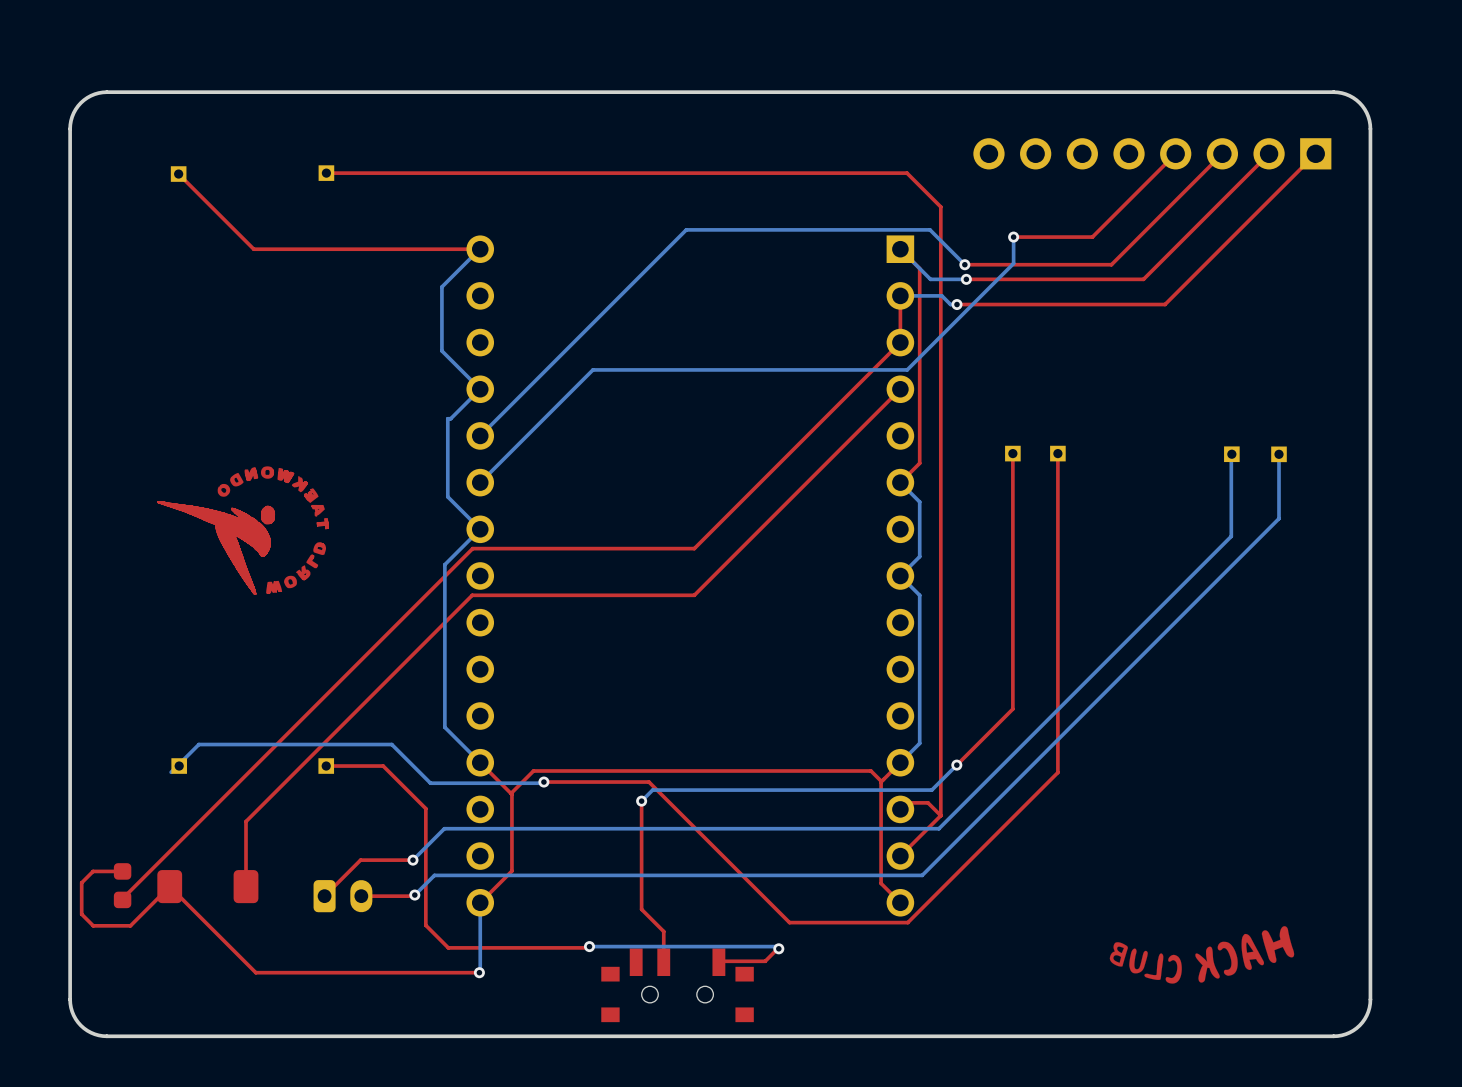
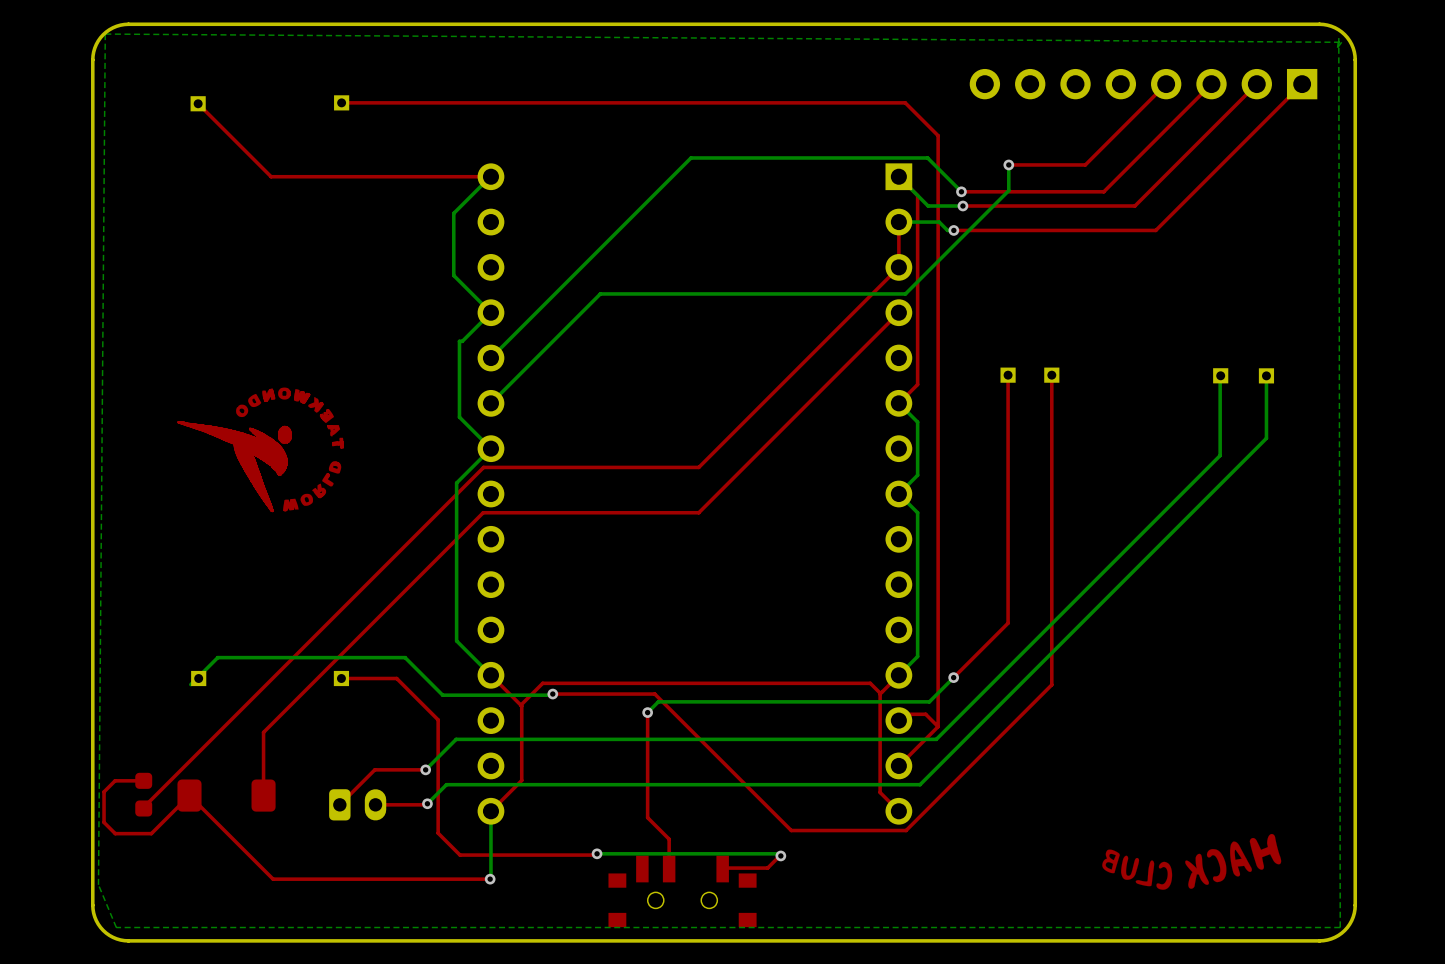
bottom zone outline: none -> (105, 34) (98, 884) (116, 927) (1340, 927) (1338, 38) (1337, 47) (1341, 42) (105, 34)

